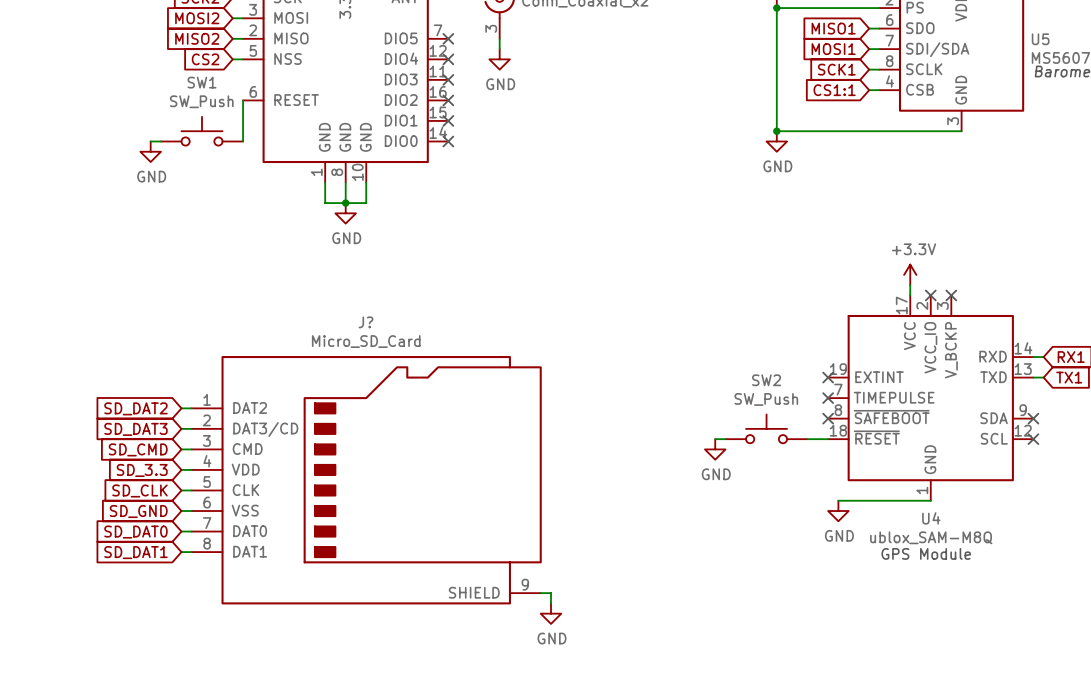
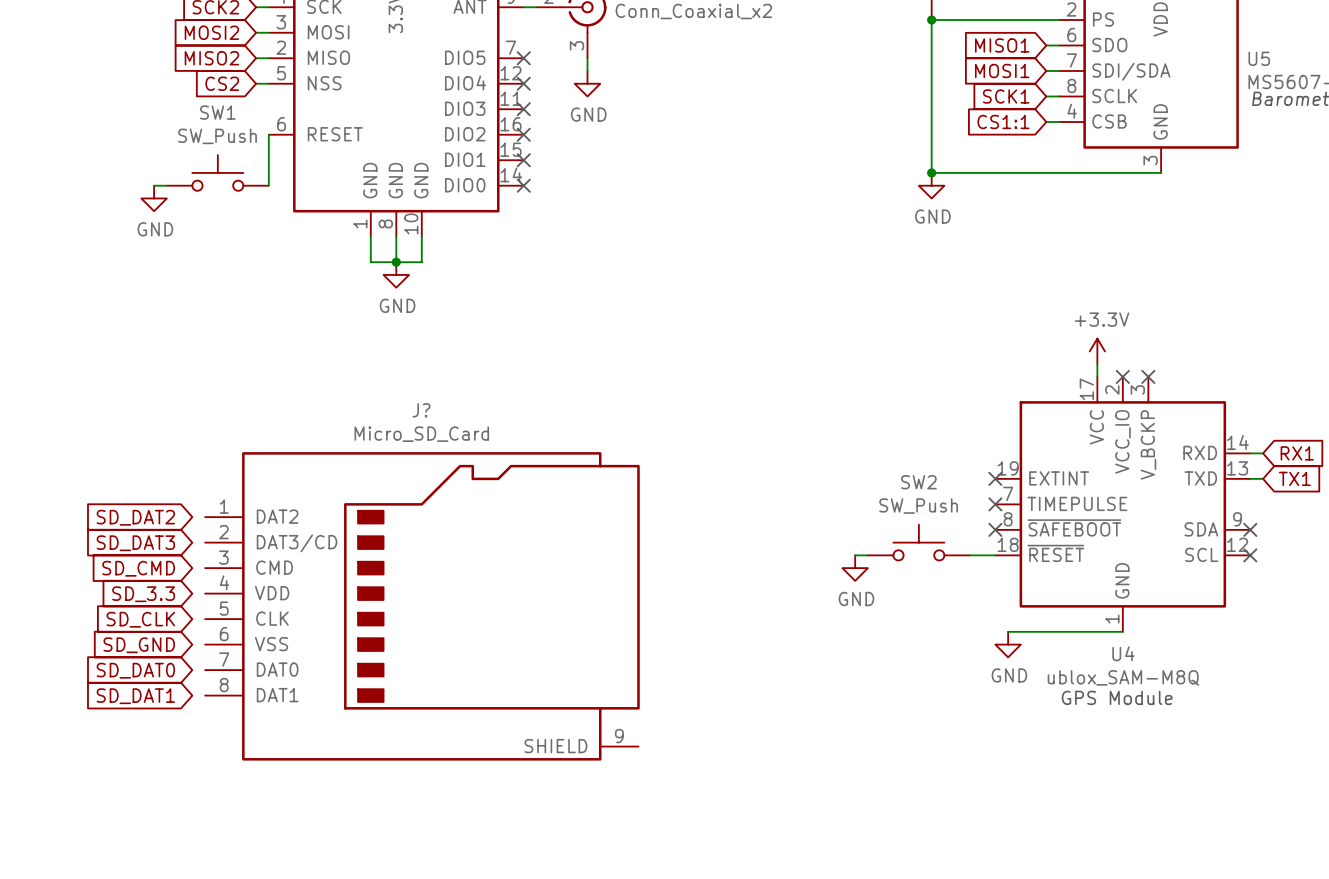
wire: (181, 408) (191, 408) -> none
wire: (181, 428) (191, 428) -> none
wire: (181, 449) (191, 449) -> none
wire: (181, 469) (191, 469) -> none
wire: (181, 490) (191, 490) -> none
wire: (181, 511) (191, 511) -> none
wire: (181, 531) (191, 531) -> none
wire: (181, 552) (191, 552) -> none
wire: (540, 593) (550, 593) (550, 603) -> none
power symbol: GND (550, 613) -> none

